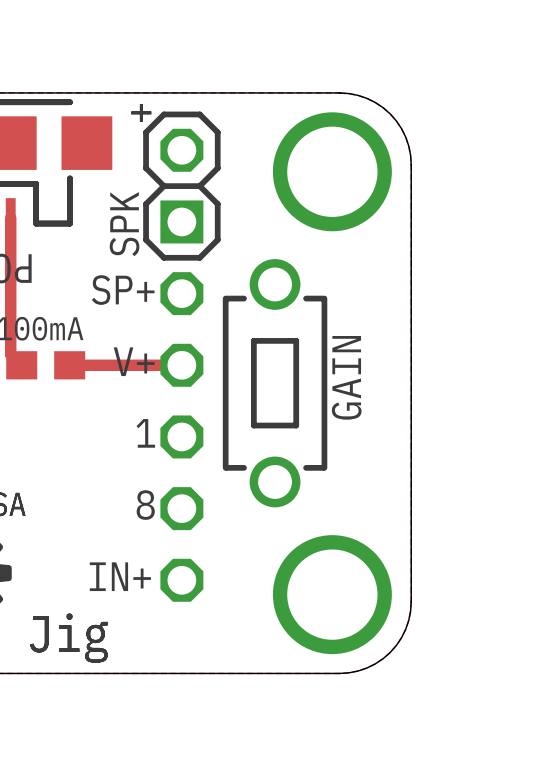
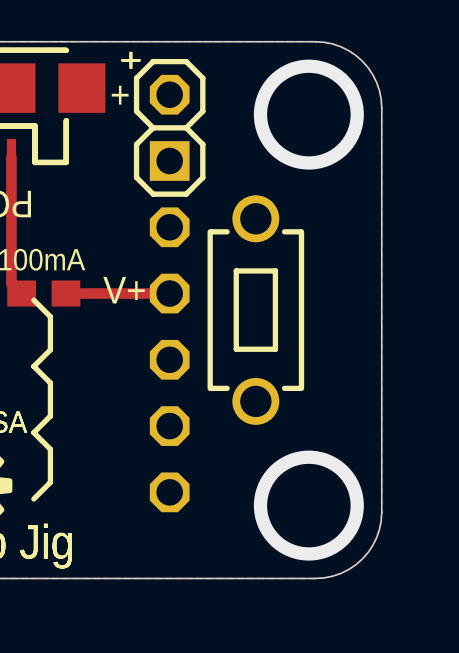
text: none -> + (120, 95)
text: SPK (124, 224) -> none
text: SP+ (123, 290) -> none
line: none -> (33, 300) (50, 316) (50, 349) (33, 366) (50, 382) (50, 416) (33, 432) (50, 449) (50, 482) (33, 498)
text: GAIN (346, 377) -> none
text: 1 (145, 433) -> none
text: 8 (145, 505) -> none
text: IN+ (120, 576) -> none

